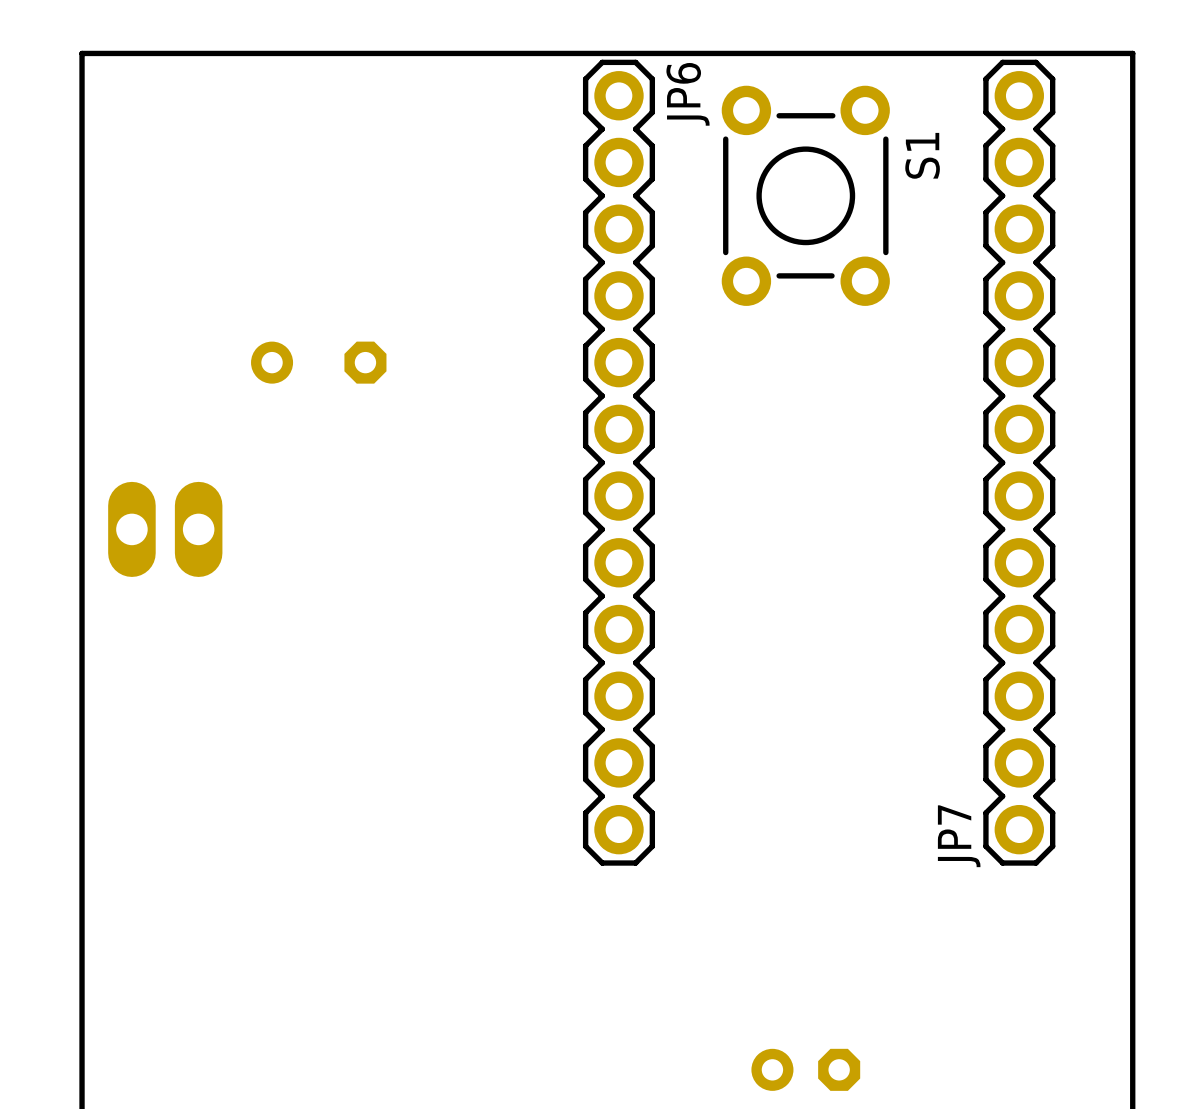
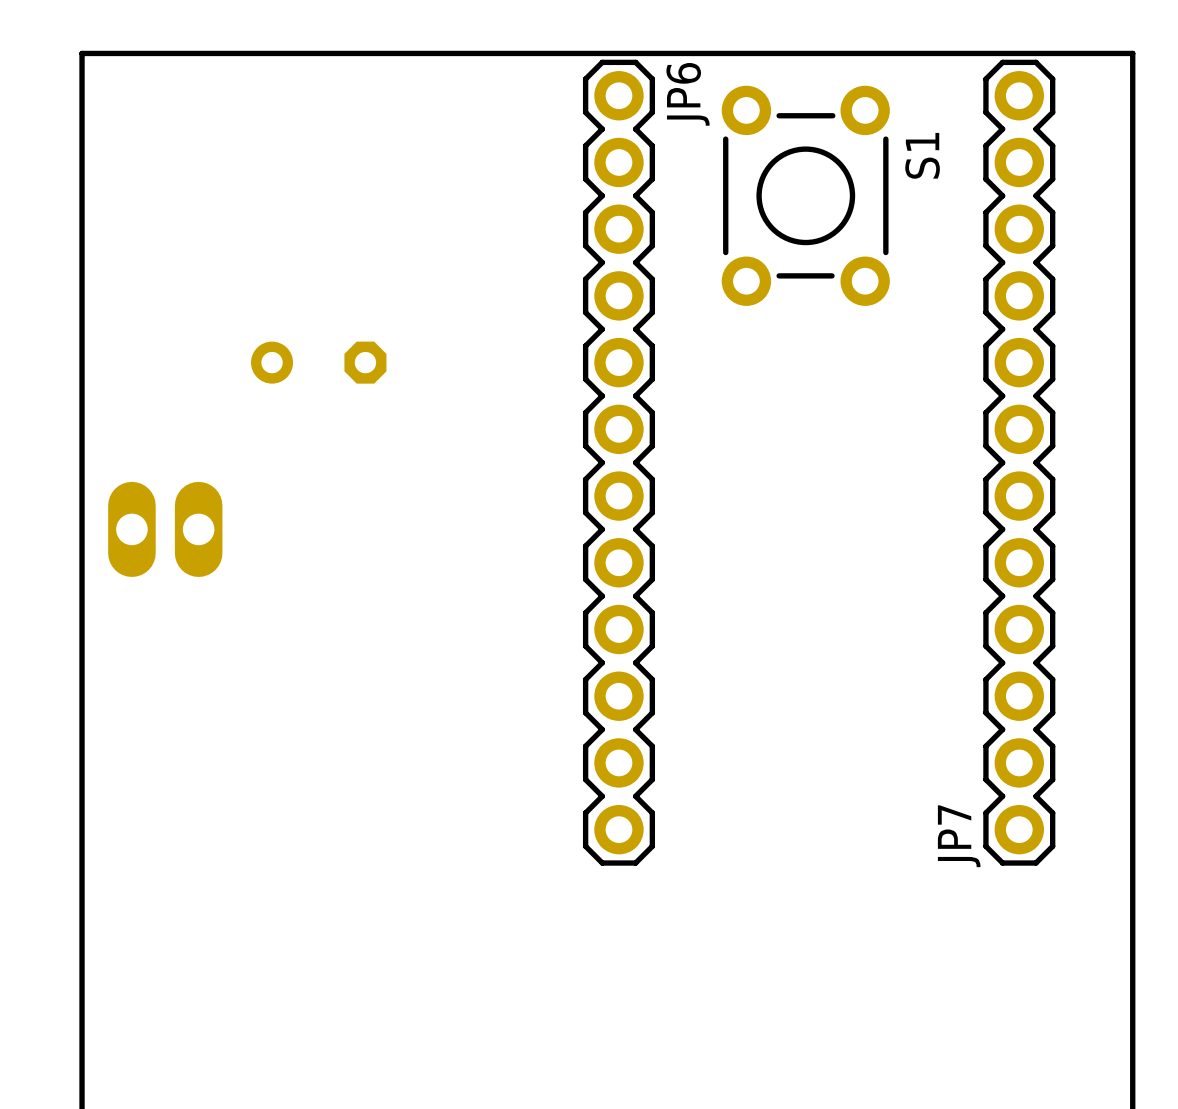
part: (805, 1069) -> none

